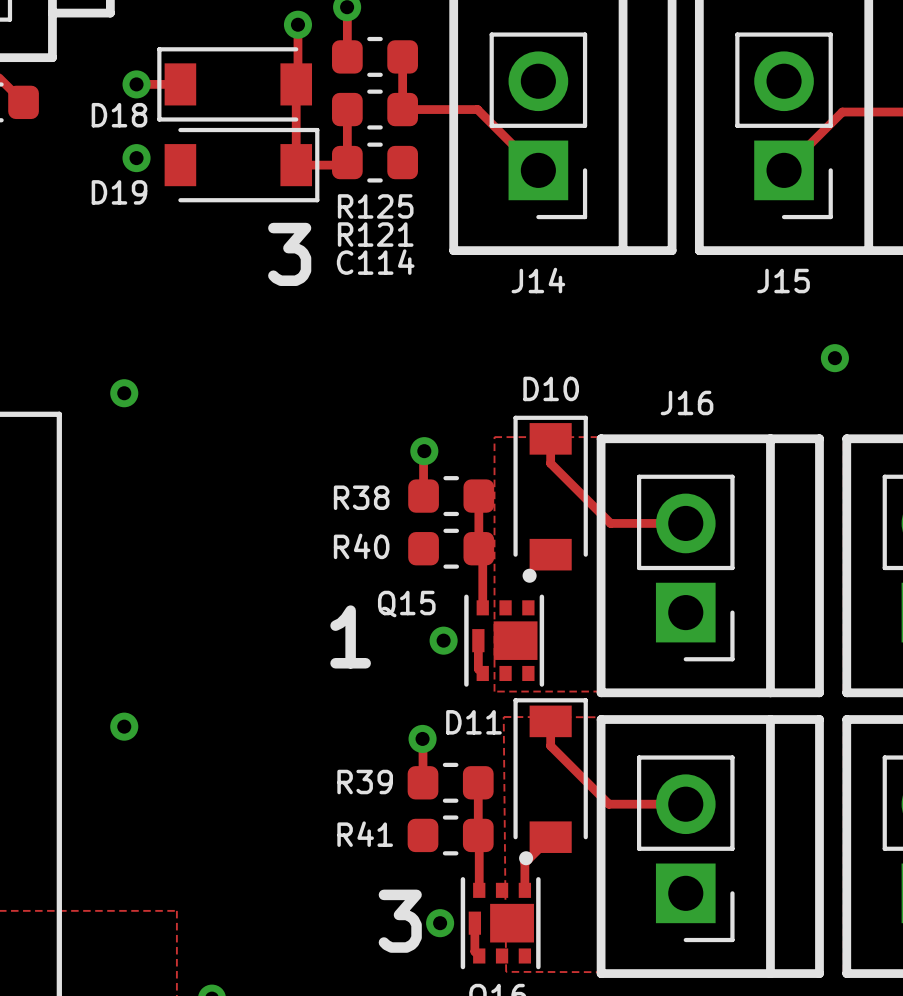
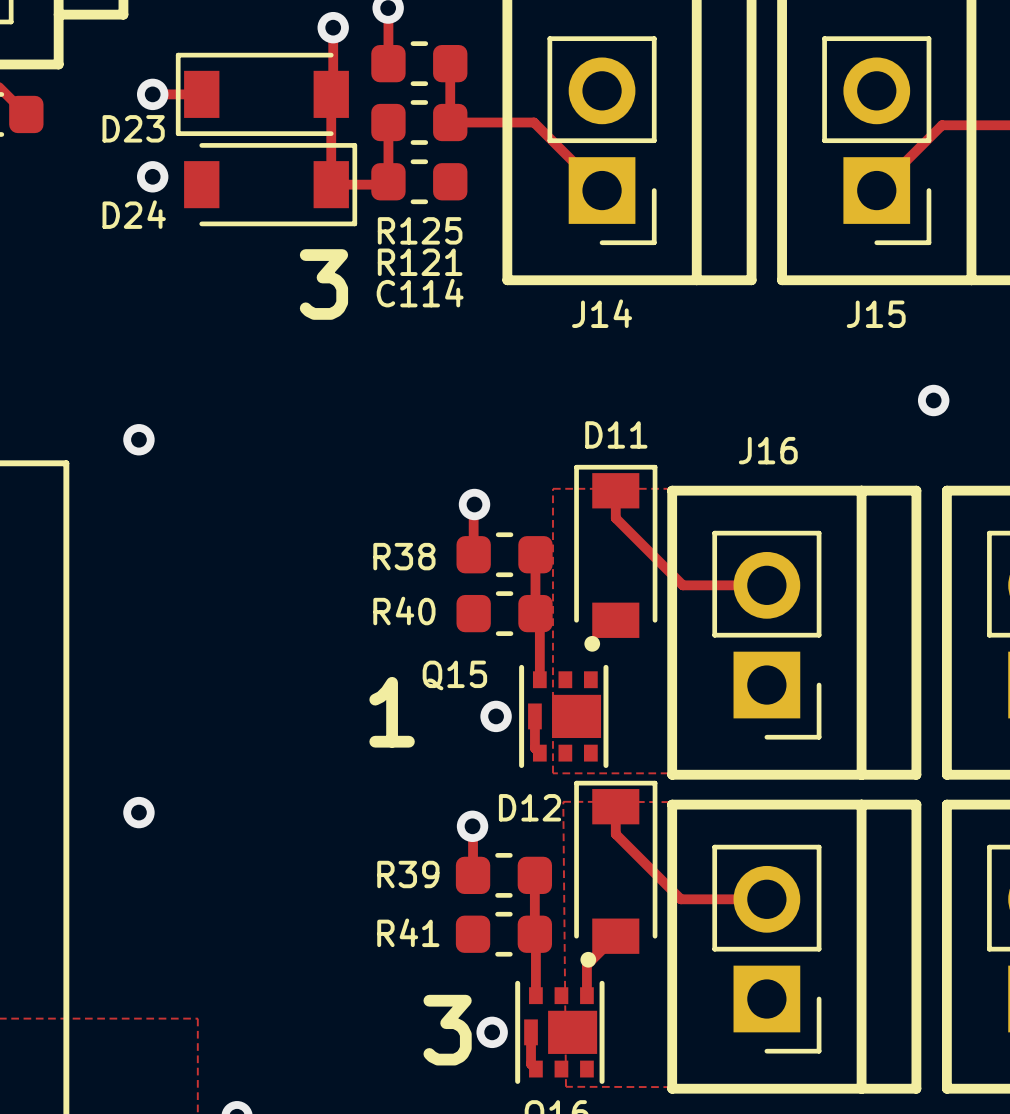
D18 name: D18 (119, 115) -> D23 (133, 128)
D19 name: D19 (119, 192) -> D24 (134, 214)
D10 name: D10 (551, 388) -> D11 (616, 434)
D11 name: D11 (473, 722) -> D12 (530, 807)

